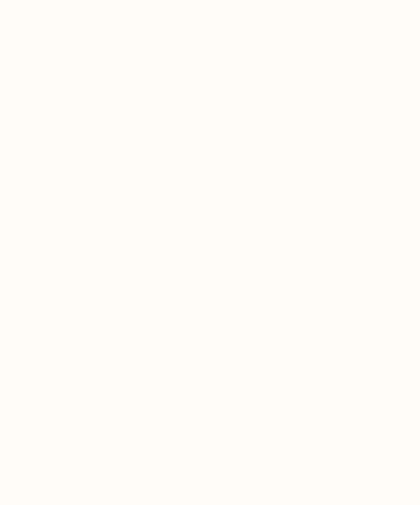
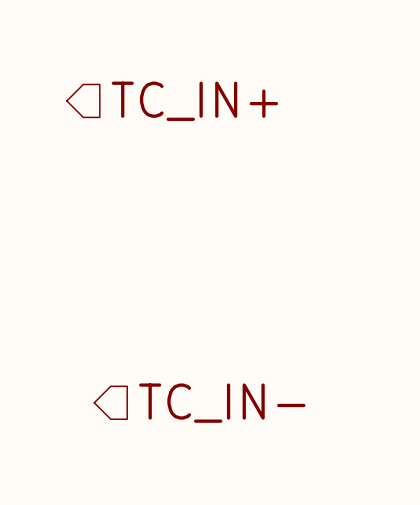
hierarchical label: none -> TC_IN+ (194, 101)
hierarchical label: none -> TC_IN- (222, 403)

